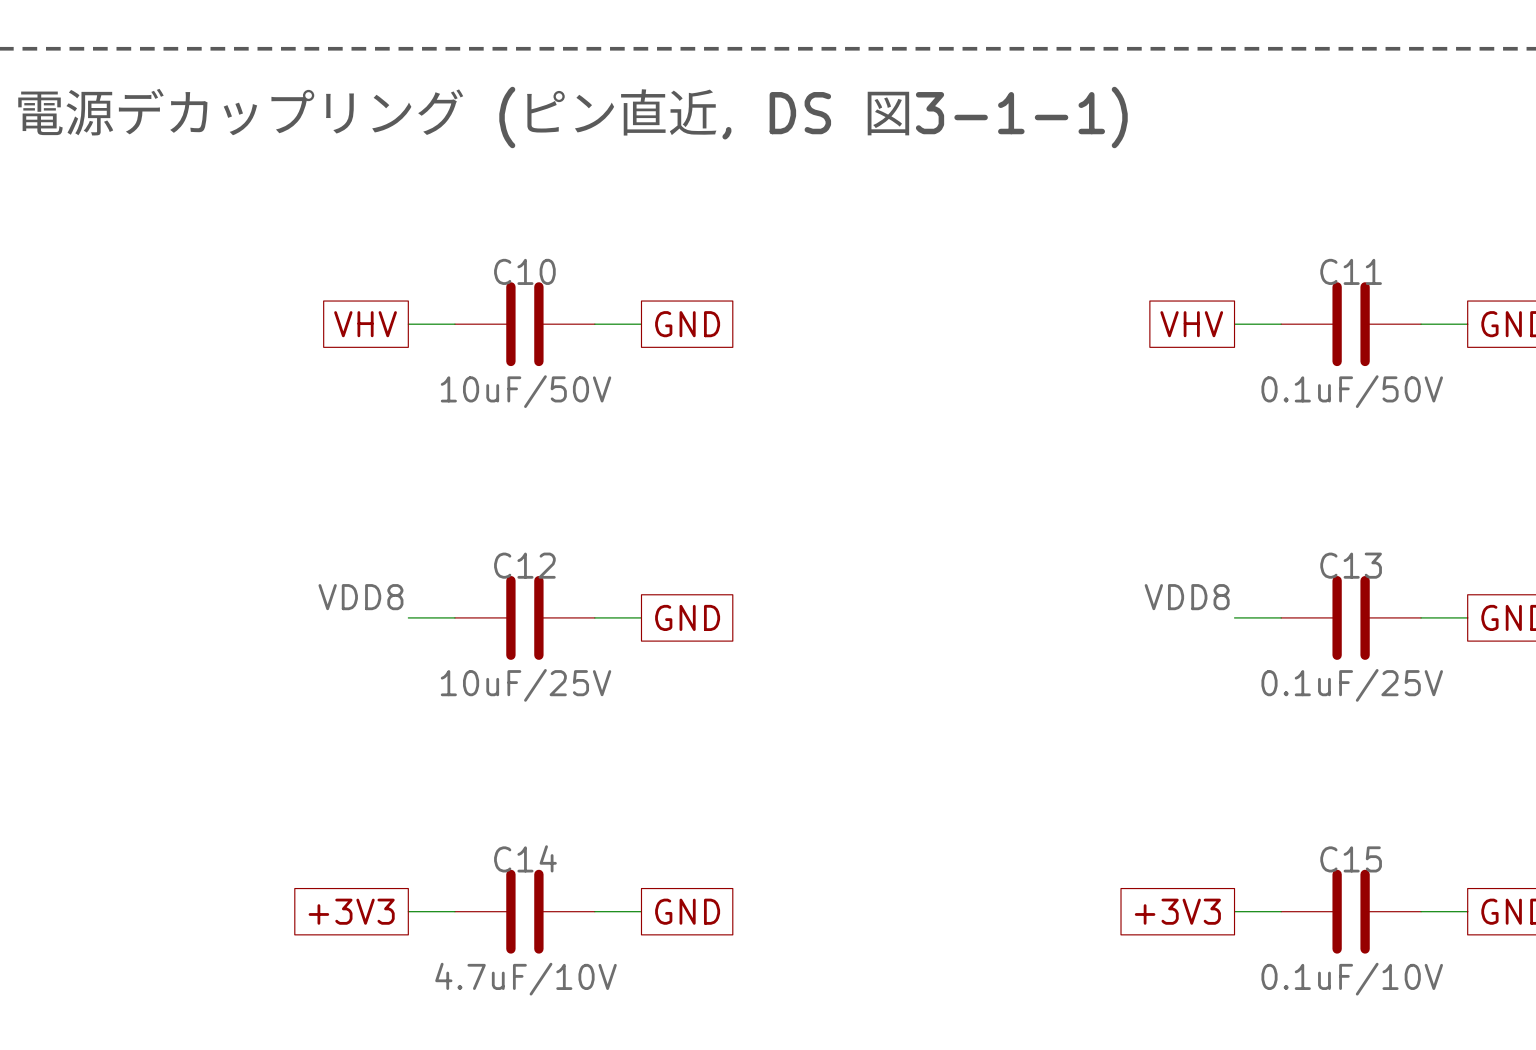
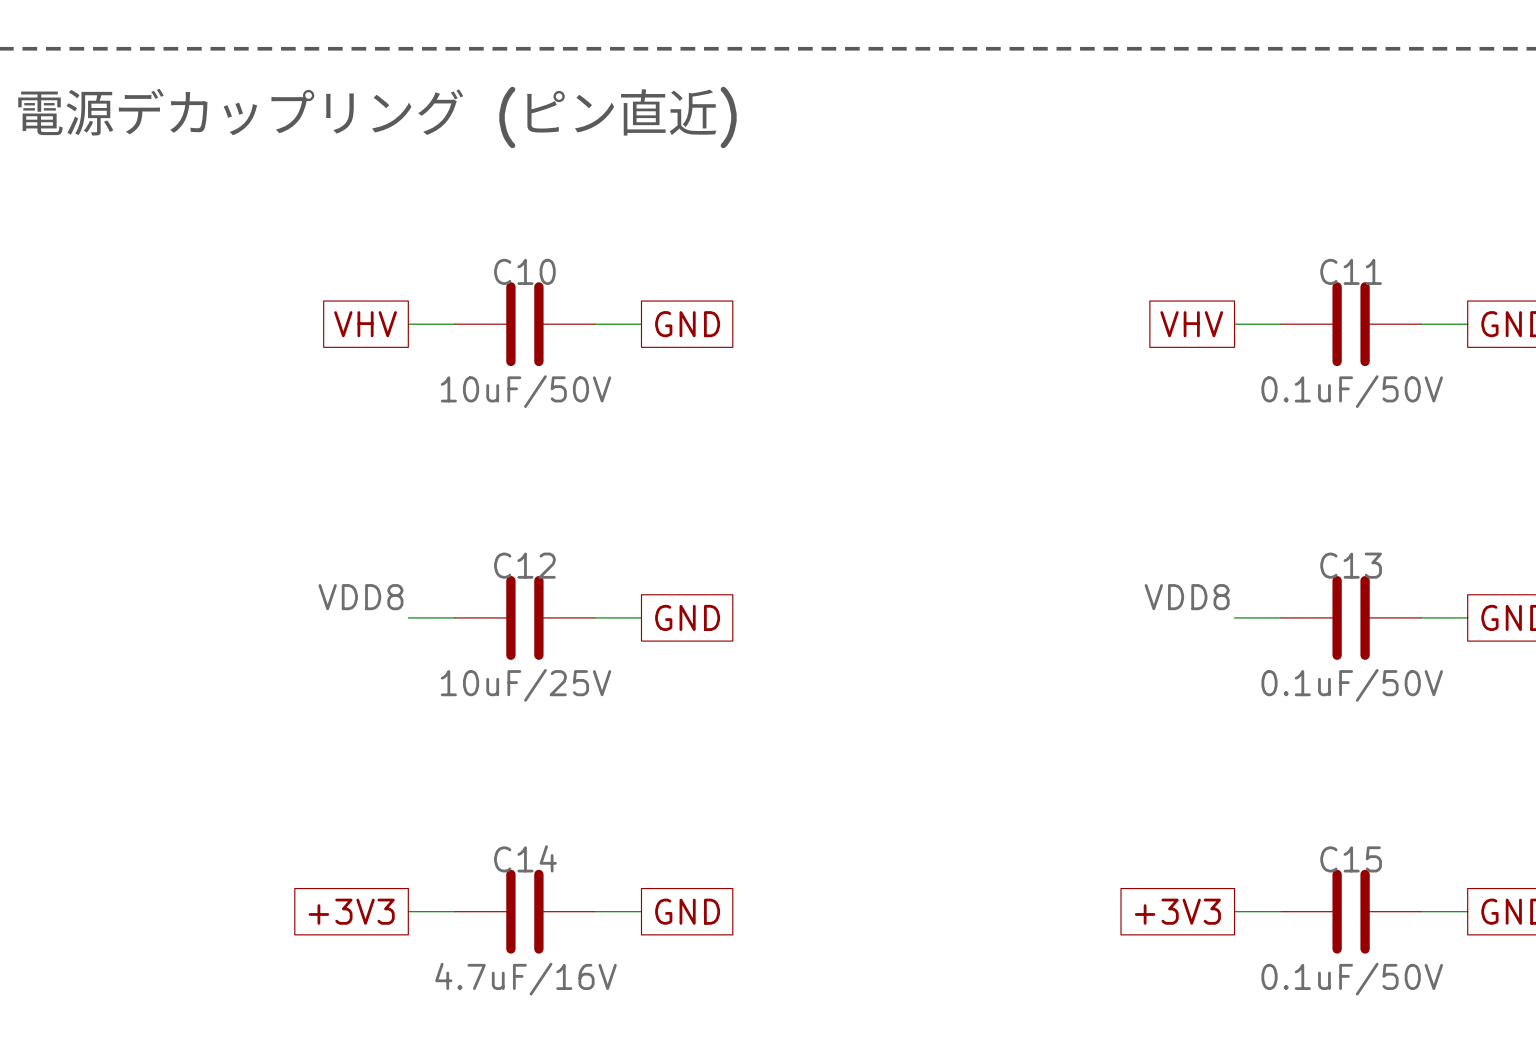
text: 電源デカップリング (ピン直近, DS 図3-1-1) (571, 117) -> 電源デカップリング (ピン直近) (376, 117)
C13 value: 0.1uF/25V (1352, 685) -> 0.1uF/50V (1352, 685)
C14 value: 4.7uF/10V (526, 979) -> 4.7uF/16V (526, 979)
C15 value: 0.1uF/10V (1352, 979) -> 0.1uF/50V (1352, 979)

